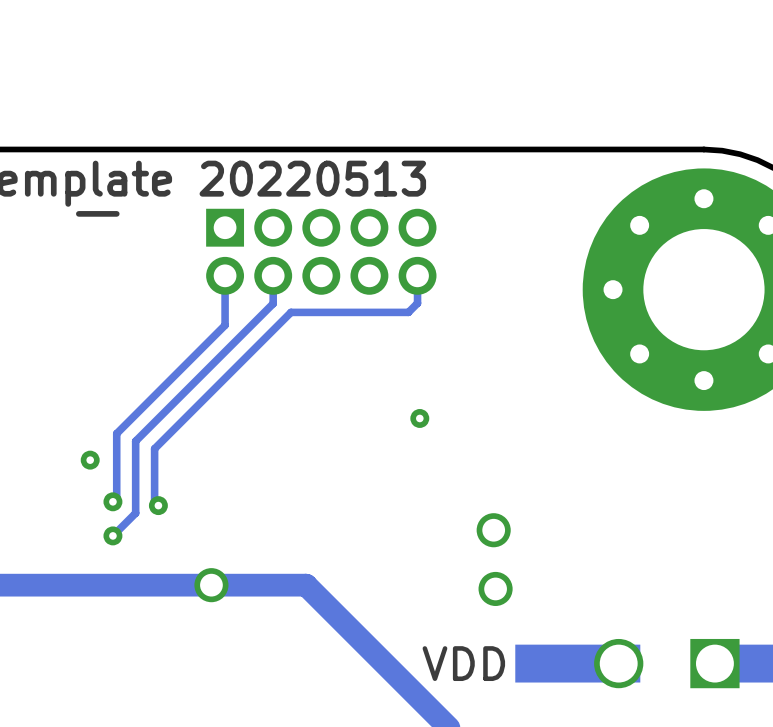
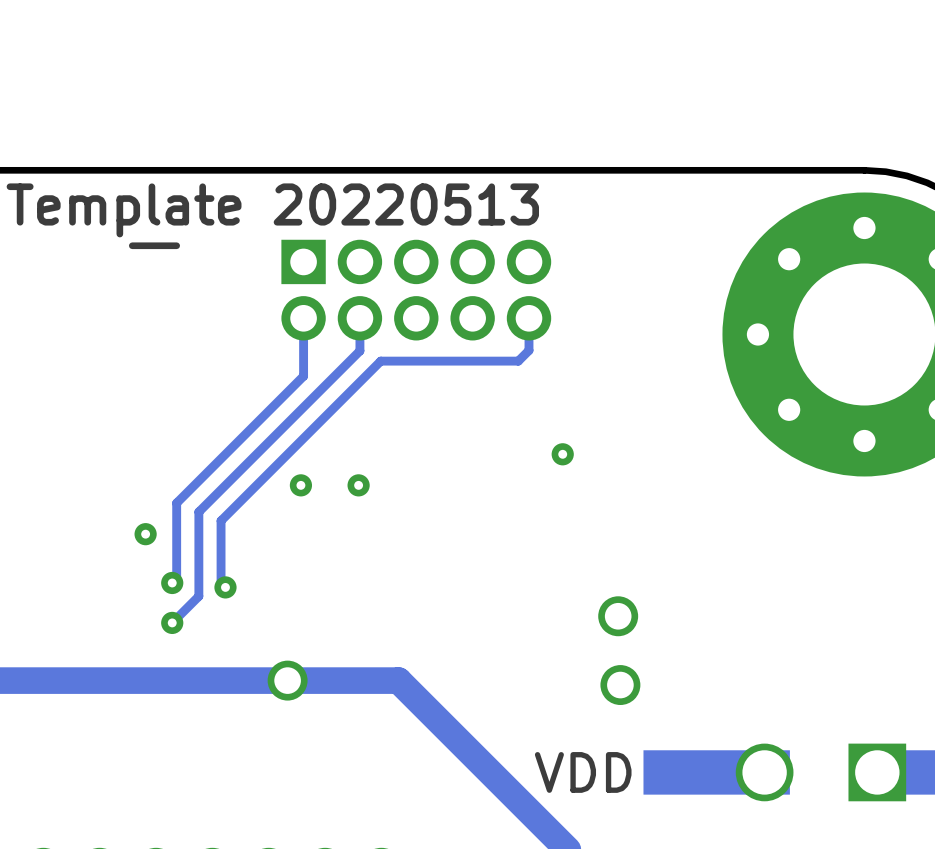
via: none -> (300, 485)
via: none -> (358, 485)
via position: (419, 418) -> (562, 454)

